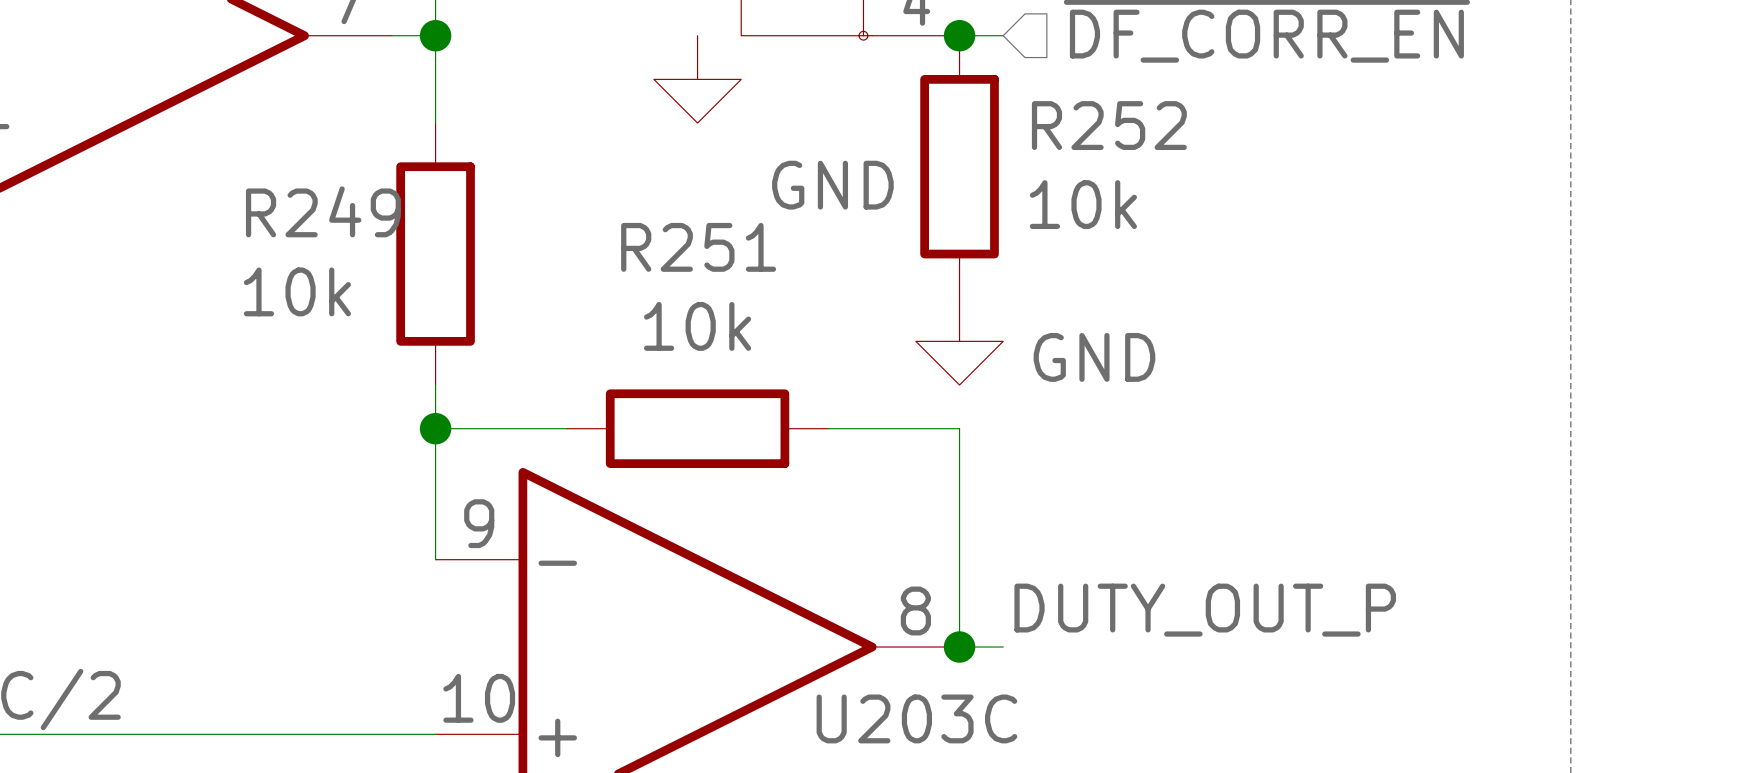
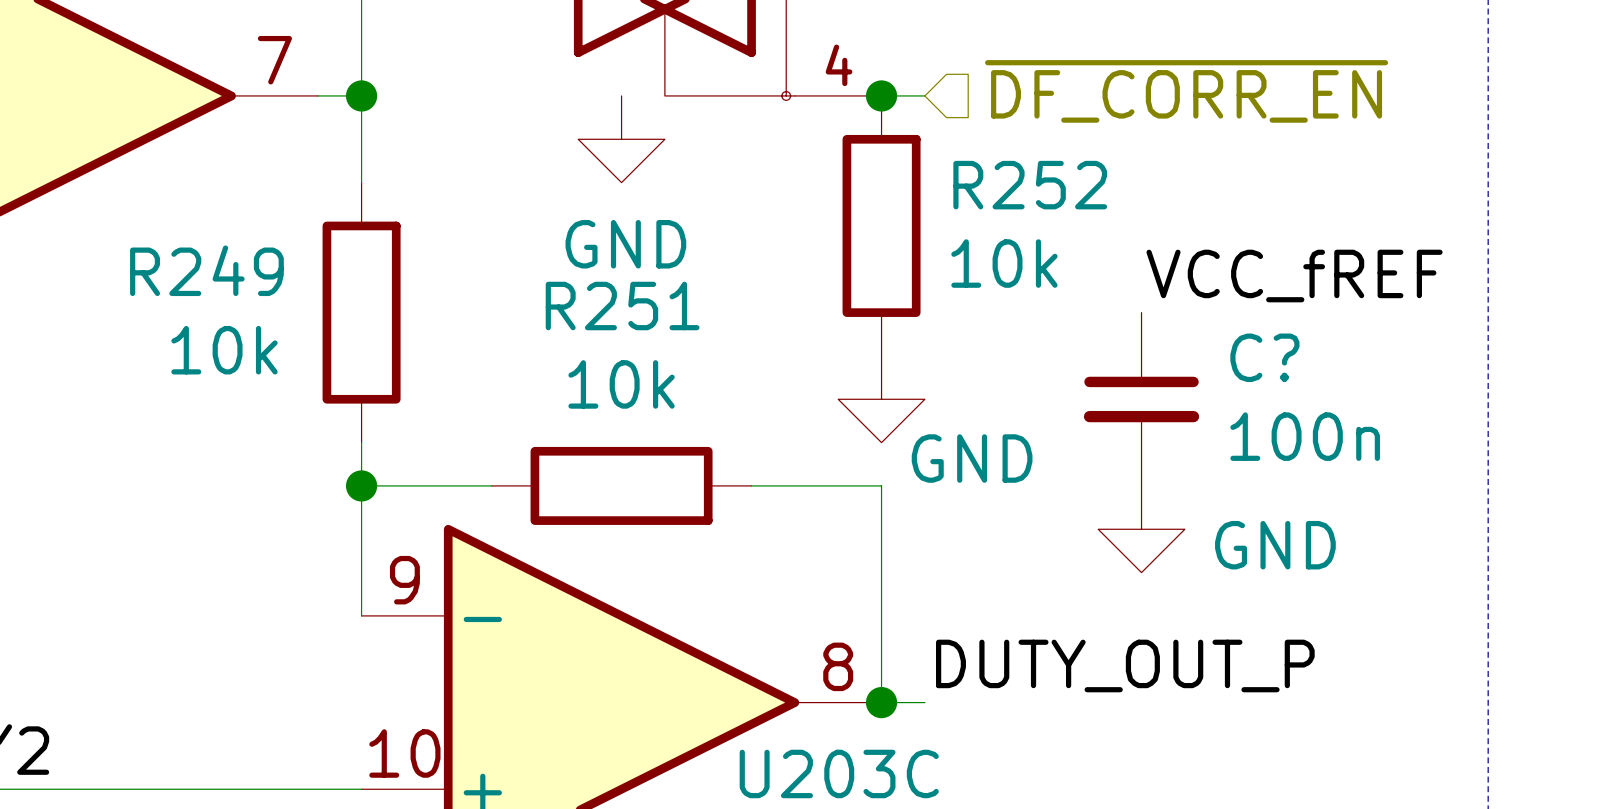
power symbol text position: GND (832, 185) -> GND (625, 244)
R249 name position: R249 (323, 211) -> R249 (206, 270)
label: none -> VCC_fREF (1294, 276)
C?: none -> 100n (1141, 399)
power symbol text position: GND (1094, 357) -> GND (972, 458)
power symbol: none -> GND (1141, 529)

